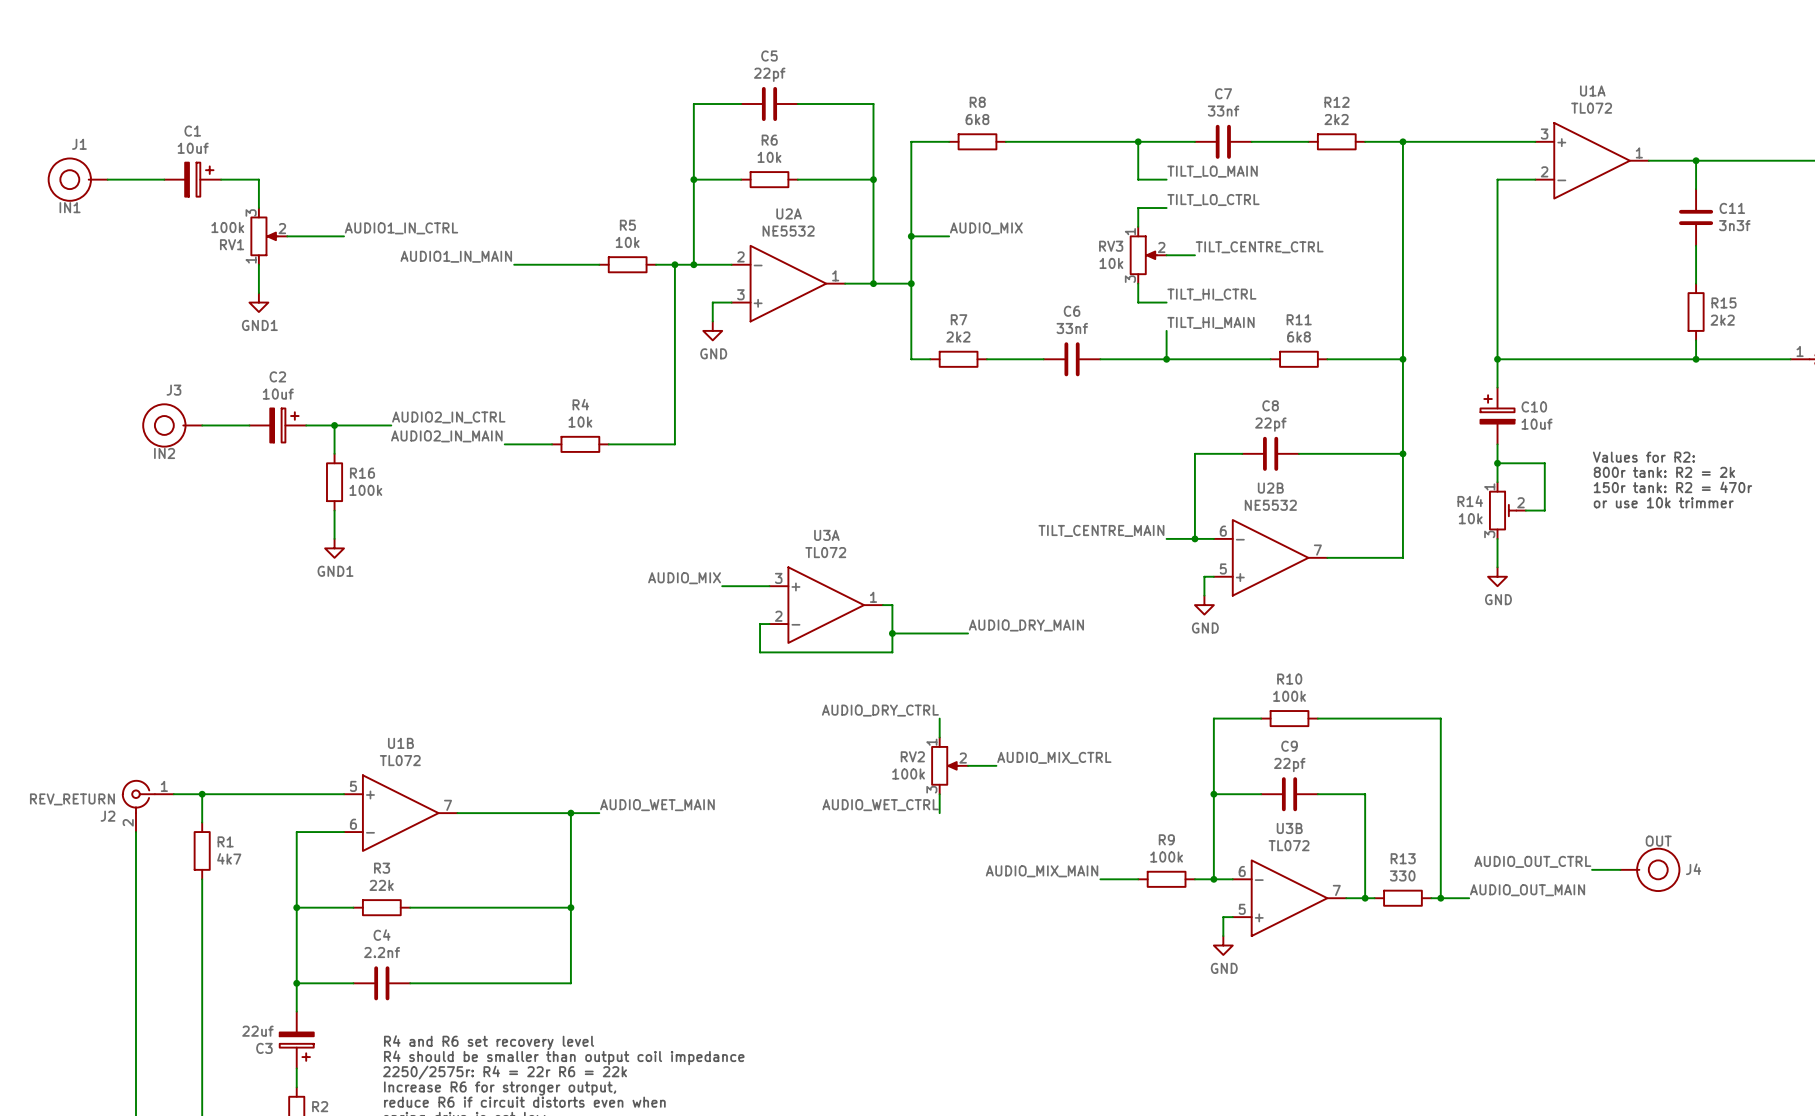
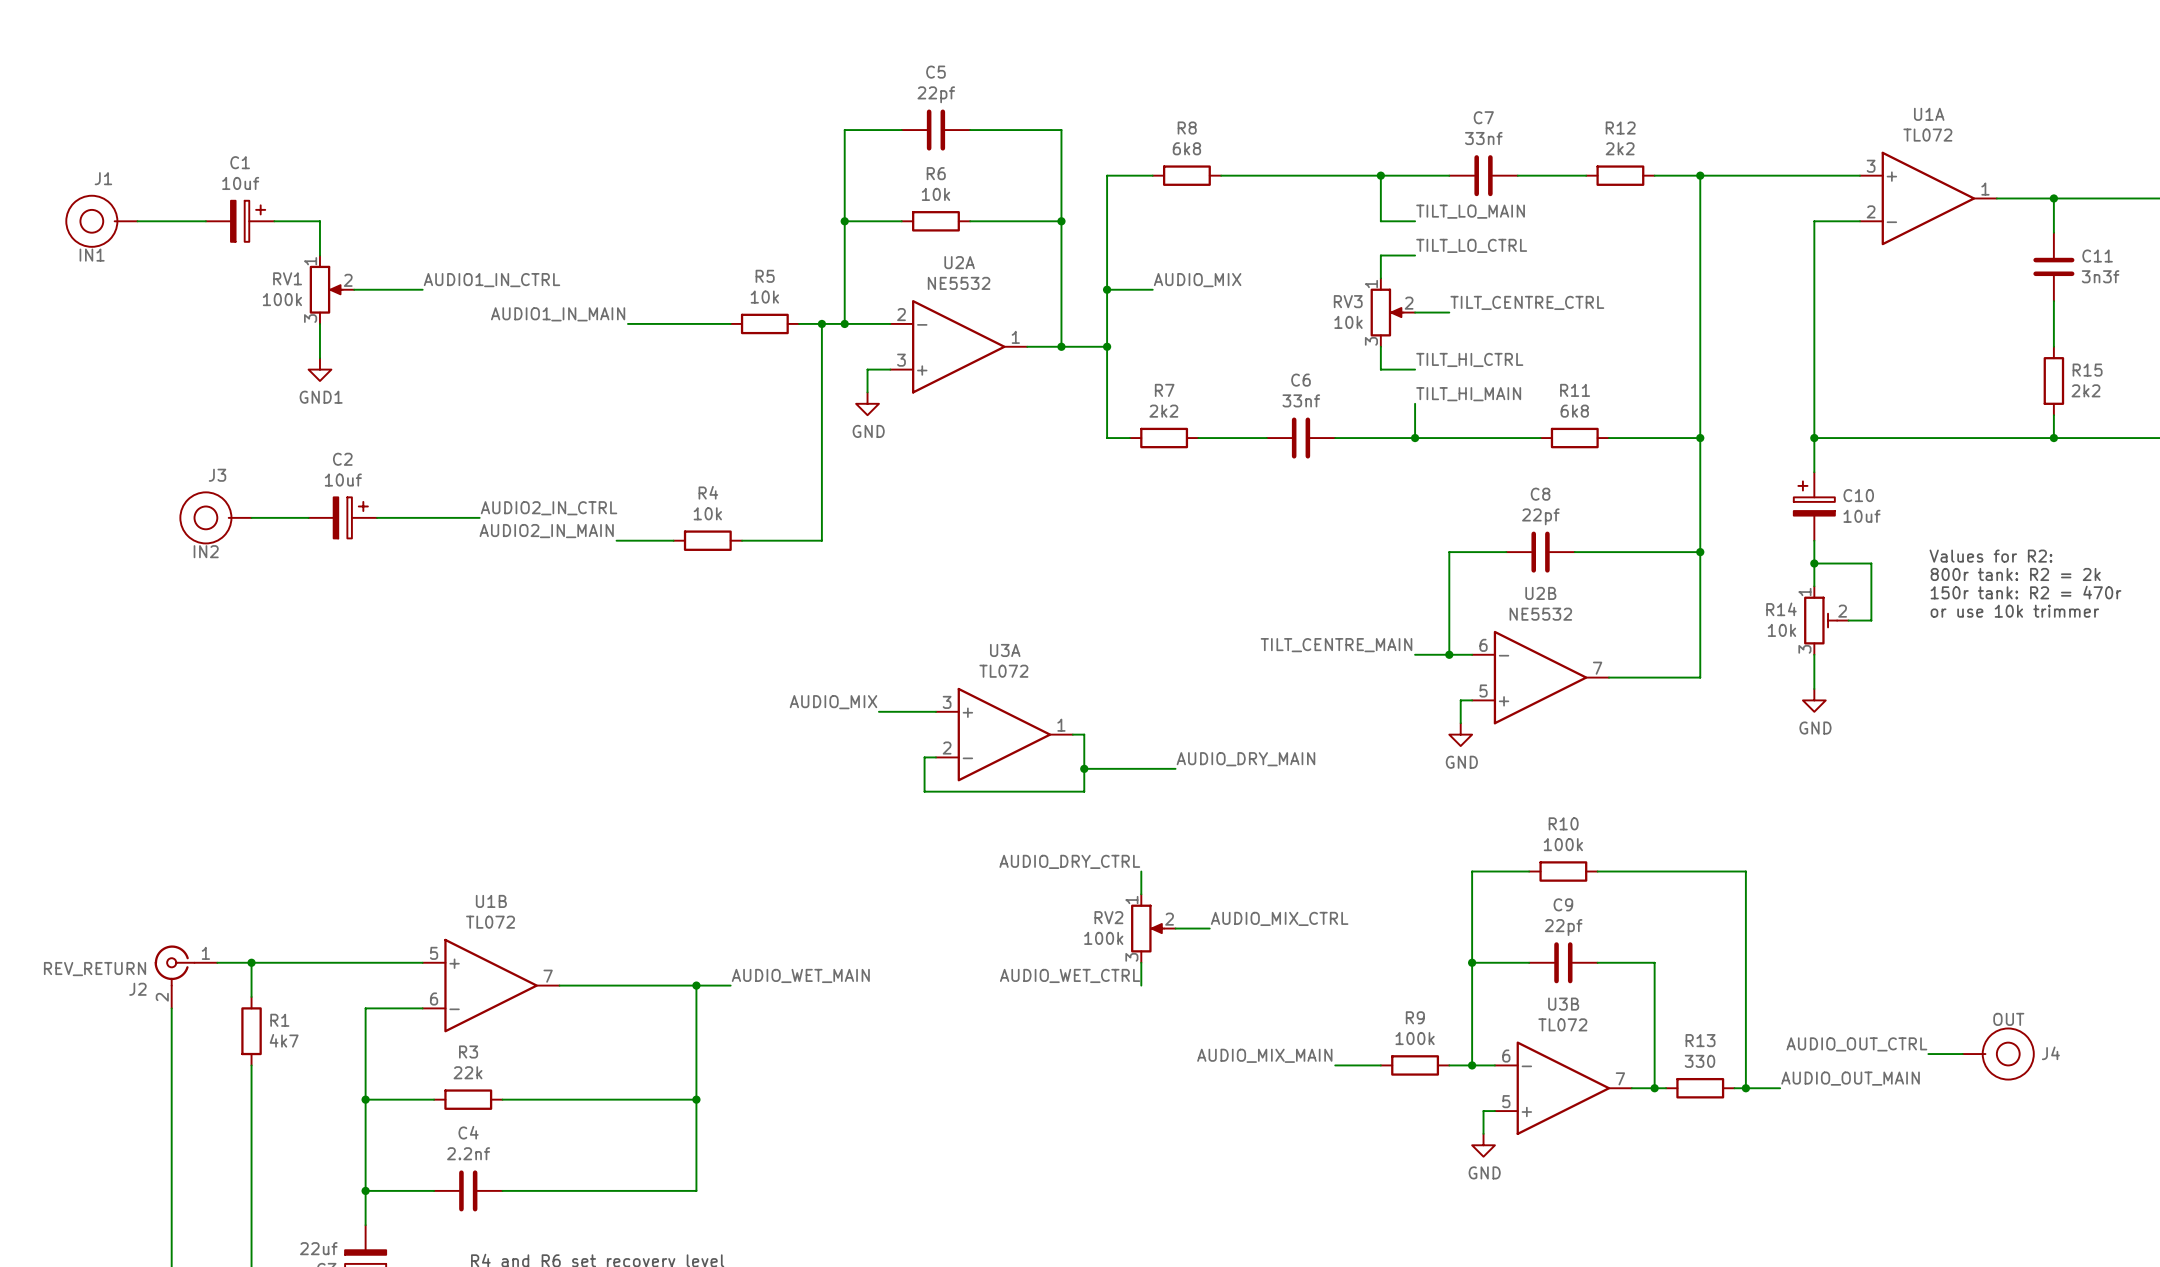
RV1 flip: as is (264, 236) -> up-down (326, 289)
wire: (334, 425) (334, 453) -> none
junction: (334, 425) -> none
R16: 100k (334, 482) -> none
wire: (334, 510) (334, 538) -> none
power symbol: GND1 (334, 548) -> none

